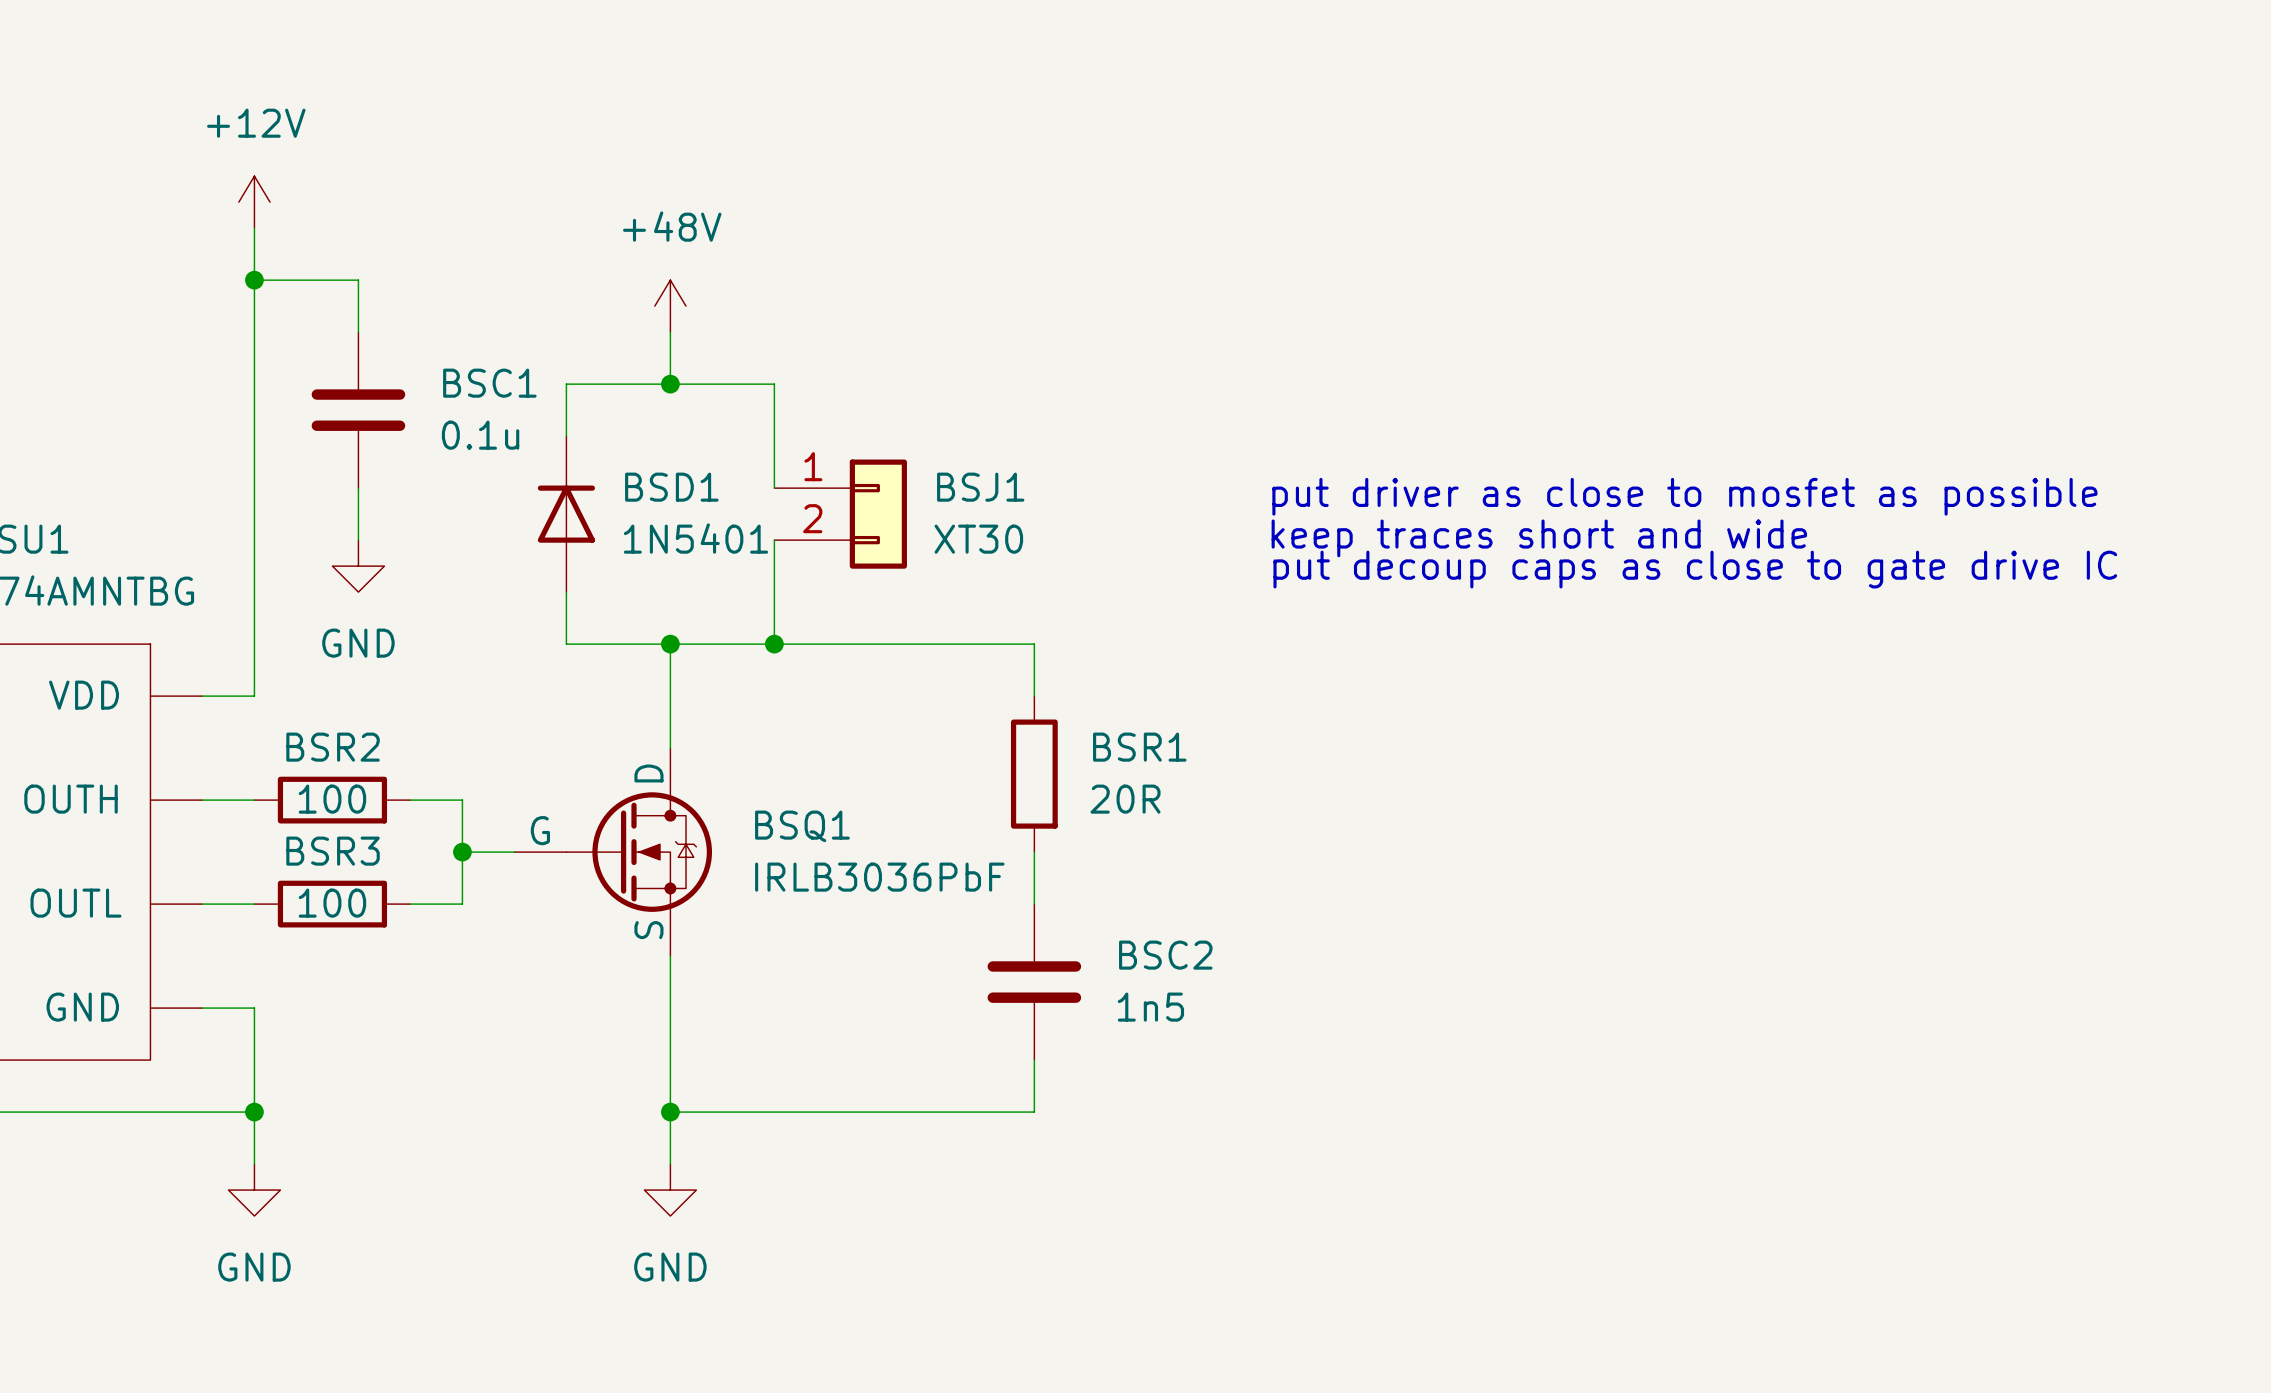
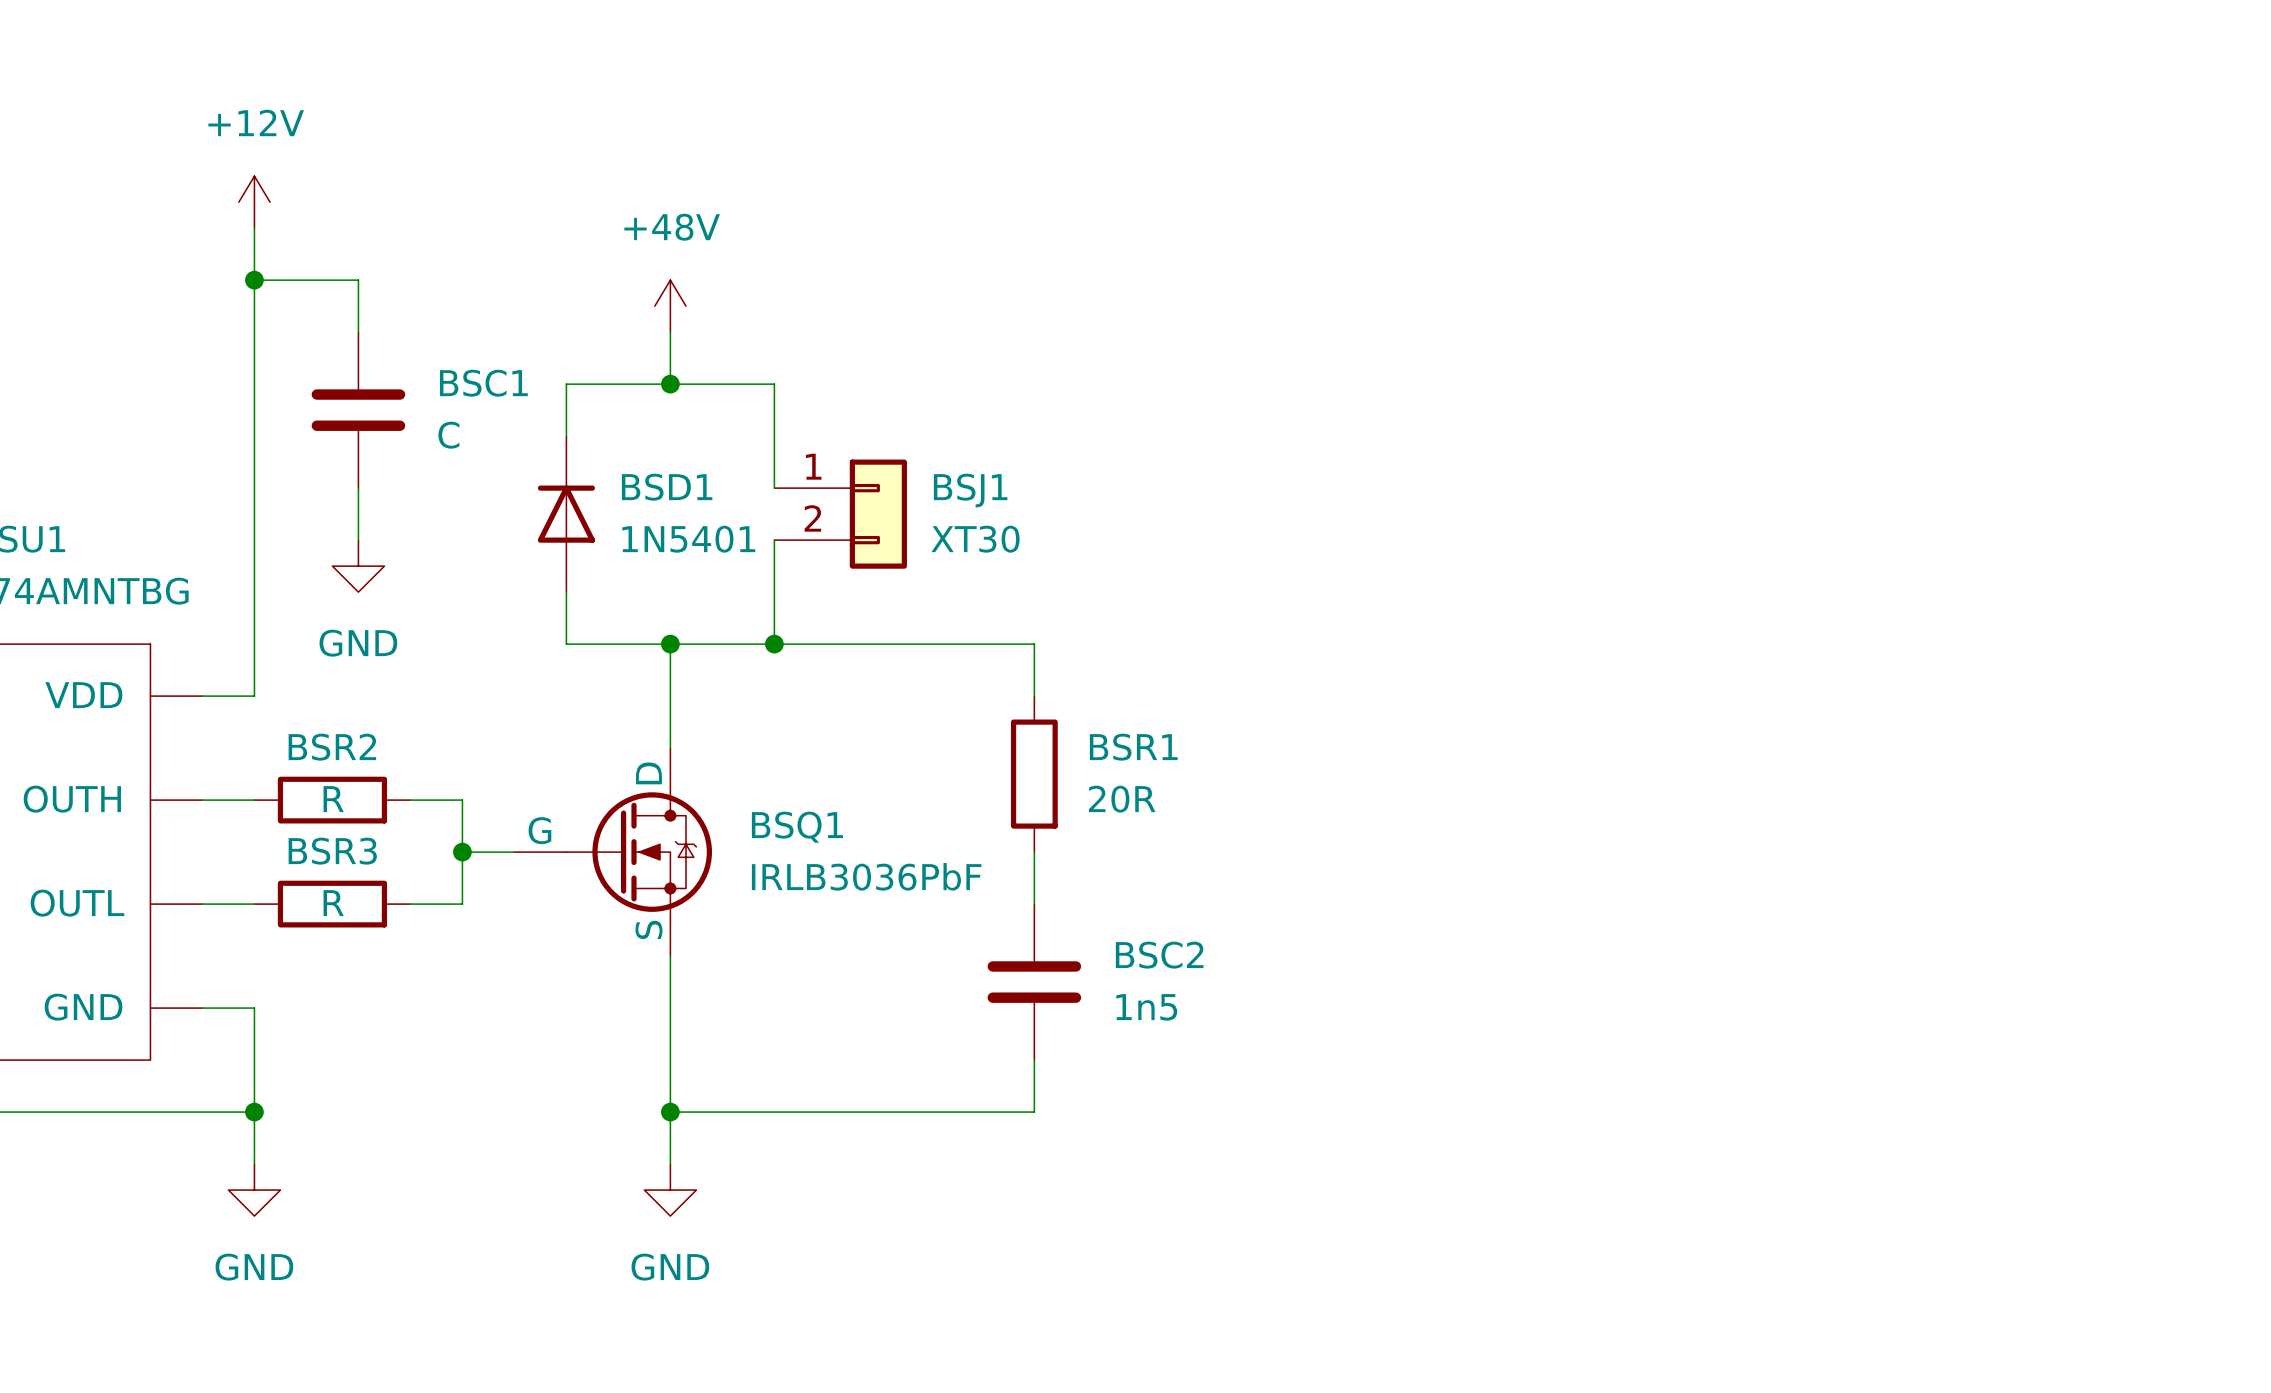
BSC1 value: 0.1u (480, 435) -> C (448, 435)
text: put driver as close to mosfet as possible (1684, 496) -> none
text: keep traces short and wide (1539, 538) -> none
text: put decoup caps as close to gate drive IC (1695, 569) -> none
BSR2 value: 100 (332, 799) -> R (333, 799)
BSR3 value: 100 (332, 903) -> R (333, 903)

